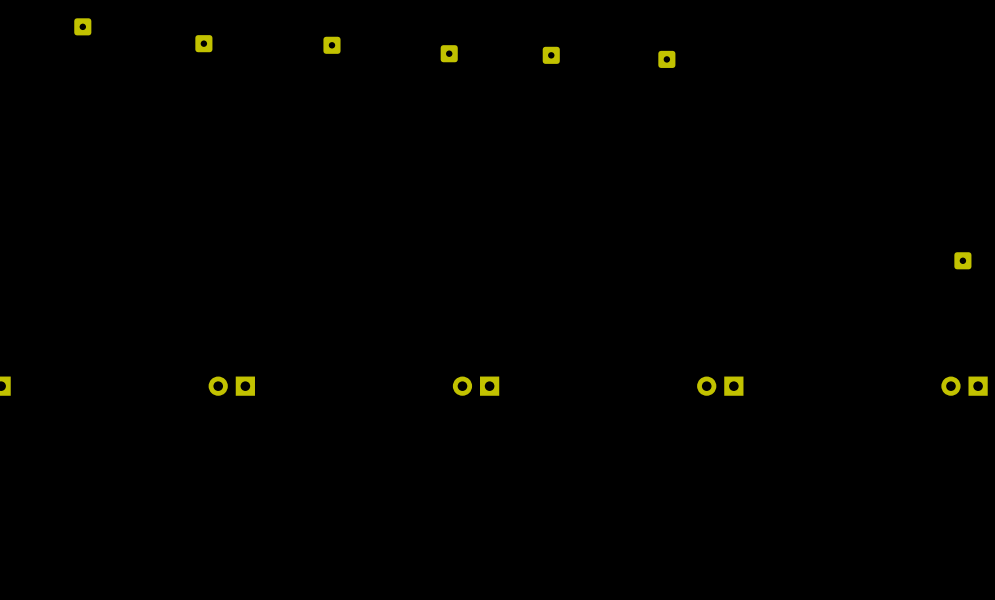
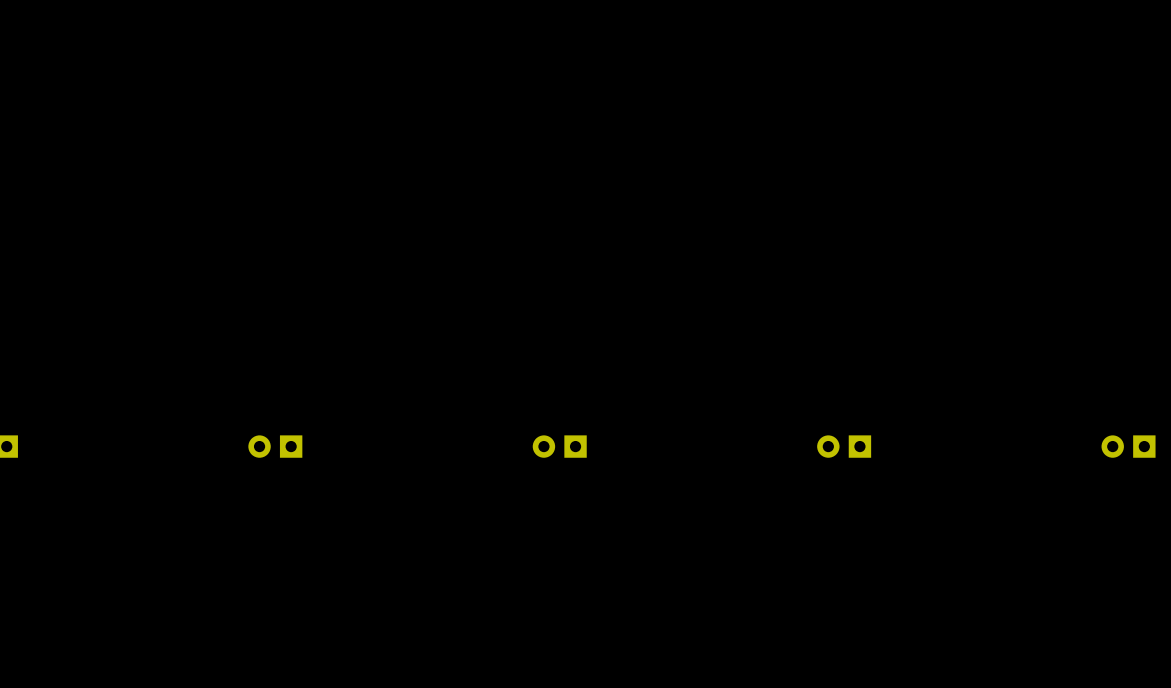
part: (82, 26) -> none
part: (203, 43) -> none
part: (331, 45) -> none
part: (449, 53) -> none
part: (551, 55) -> none
part: (666, 59) -> none
part: (962, 260) -> none

